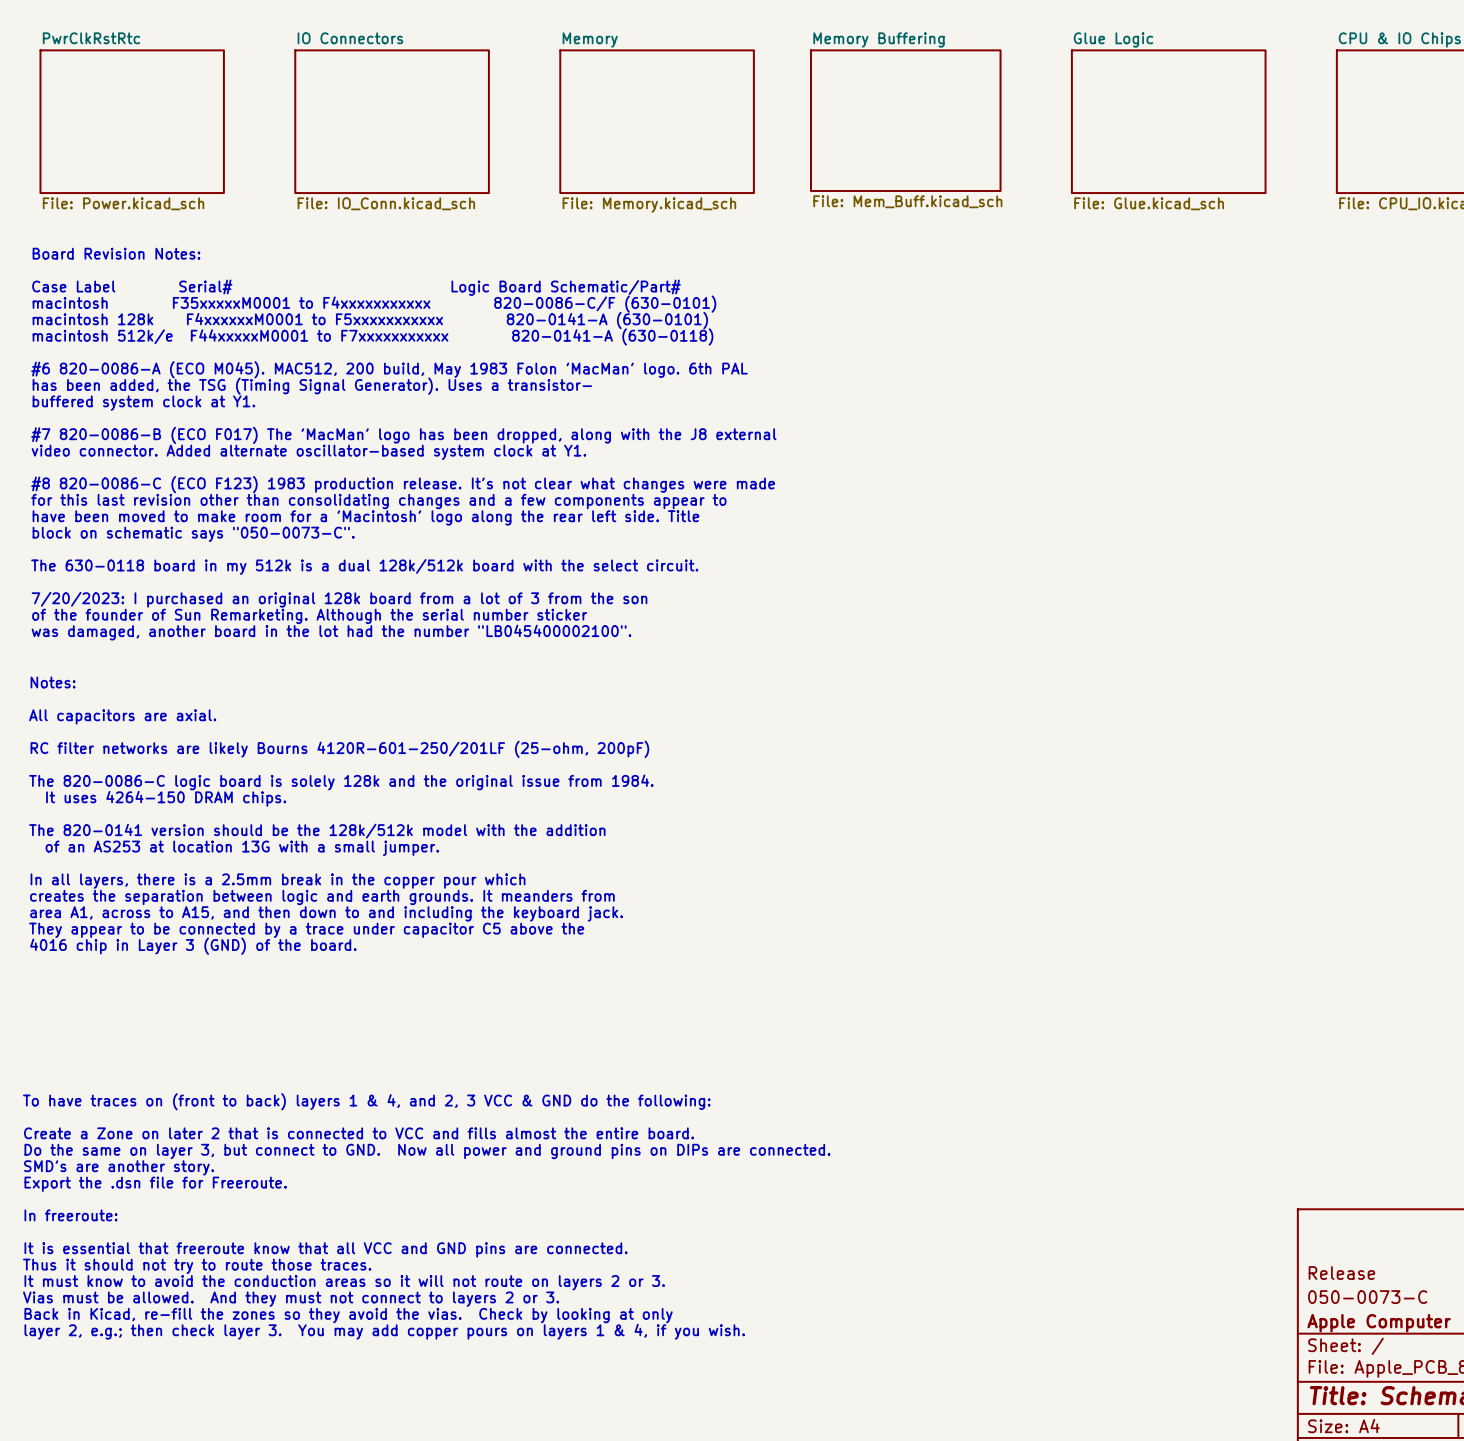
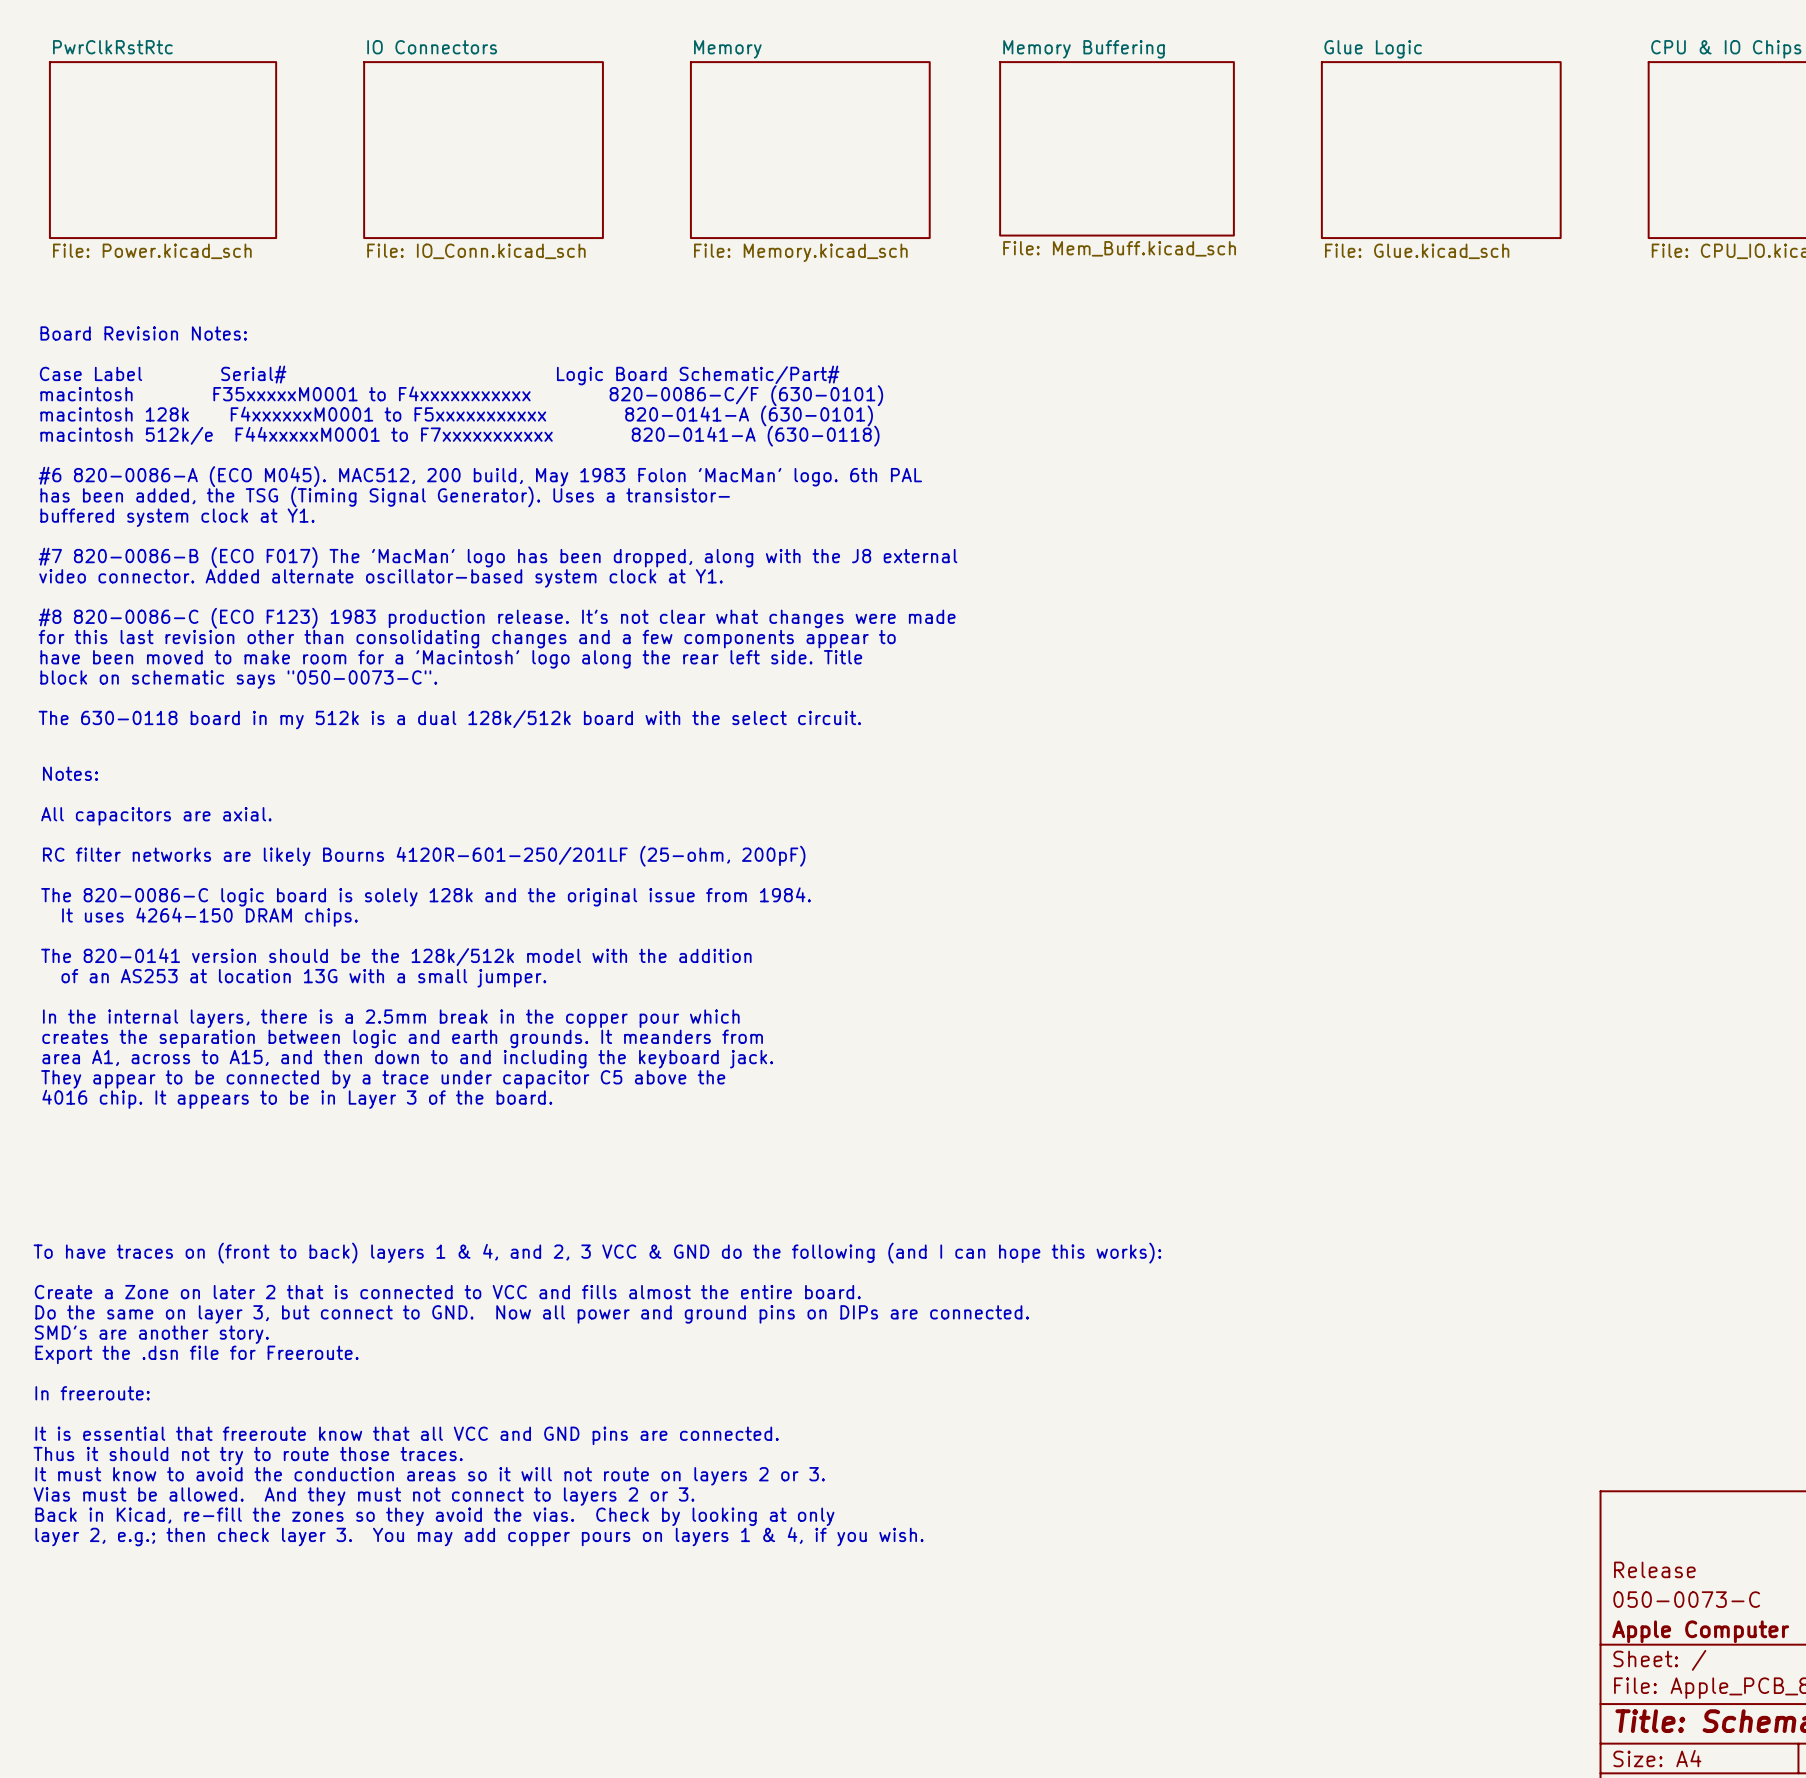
text position: Board Revision Notes: (116, 253) -> Board Revision Notes: (143, 333)
text: Case Label Serial# Logic Board Schematic/Part# (356, 287) -> none
text: macintosh F35xxxxxM0001 to F4xxxxxxxxxxx 820-0086-C/F (630-0101) (374, 304) -> Case Label Serial# Logic Board Schematic/Part# (439, 375)
text: macintosh 128k F4xxxxxxM0001 to F5xxxxxxxxxxx 820-0141-A (630-0101) (370, 320) -> macintosh F35xxxxxM0001 to F4xxxxxxxxxxx 820-0086-C/F (630-0101) (461, 395)
text: macintosh 512k/e F44xxxxxM0001 to F7xxxxxxxxxxx 820-0141-A (630-0118) (373, 336) -> macintosh 128k F4xxxxxxM0001 to F5xxxxxxxxxxx 820-0141-A (630-0101) (456, 415)
text: none -> macintosh 512k/e F44xxxxxM0001 to F7xxxxxxxxxxx 820-0141-A (630-0118) (459, 436)
text: #6 820-0086-A (ECO M045). MAC512, 200 build, May 1983 Folon 'MacMan' logo. 6th PAL (389, 369) -> none
text: has been added, the TSG (Timing Signal Generator). Uses a transistor- (312, 386) -> #6 820-0086-A (ECO M045). MAC512, 200 build, May 1983 Folon 'MacMan' logo. 6th PAL (480, 476)
text: buffered system clock at Y1. (143, 403) -> has been added, the TSG (Timing Signal Generator). Uses a transistor- (385, 496)
text: none -> buffered system clock at Y1. (177, 517)
text: #7 820-0086-B (ECO F017) The 'MacMan' logo has been dropped, along with the J8 external (403, 435) -> none
text: video connector. Added alternate oscillator-based system clock at Y1. (308, 452) -> #7 820-0086-B (ECO F017) The 'MacMan' logo has been dropped, along with the J8 external (497, 557)
text: none -> video connector. Added alternate oscillator-based system clock at Y1. (380, 578)
text: #8 820-0086-C (ECO F123) 1983 production release. It's not clear what changes were made (403, 484) -> none
text: for this last revision other than consolidating changes and a few components appear to (378, 501) -> #8 820-0086-C (ECO F123) 1983 production release. It's not clear what changes were made (497, 618)
text: have been moved to make room for a 'Macintosh' logo along the rear left side. Title (365, 517) -> for this last revision other than consolidating changes and a few components appear to (467, 639)
text: block on schematic says "050-0073-C". (193, 534) -> have been moved to make room for a 'Macintosh' logo along the rear left side. Title (451, 659)
text: none -> block on schematic says "050-0073-C". (238, 679)
text position: The 630-0118 board in my 512k is a dual 128k/512k board with the select circuit. (364, 566) -> The 630-0118 board in my 512k is a dual 128k/512k board with the select circuit. (449, 719)
text: 7/20/2023: I purchased an original 128k board from a lot of 3 from the son (339, 599) -> none
text: of the founder of Sun Remarketing. Although the serial number sticker (309, 616) -> none
text: was damaged, another board in the lot had the number "LB045400002100". (331, 632) -> none
text position: Notes: (53, 682) -> Notes: (70, 773)
text position: All capacitors are axial. (122, 716) -> All capacitors are axial. (156, 816)
text position: RC filter networks are likely Bourns 4120R-601-250/201LF (25-ohm, 200pF) (339, 749) -> RC filter networks are likely Bourns 4120R-601-250/201LF (25-ohm, 200pF) (424, 856)
text position: The 820-0086-C logic board is solely 128k and the original issue from 1984. (341, 782) -> The 820-0086-C logic board is solely 128k and the original issue from 1984. (425, 896)
text position: It uses 4264-150 DRAM chips. (166, 798) -> It uses 4264-150 DRAM chips. (209, 917)
text: none -> In the internal layers, there is a 2.5mm break in the copper pour which (391, 1018)
text position: The 820-0141 version should be the 128k/512k model with the addition (317, 831) -> The 820-0141 version should be the 128k/512k model with the addition (396, 957)
text position: of an AS253 at location 13G with a small jumper. (242, 848) -> of an AS253 at location 13G with a small jumper. (303, 978)
text: In all layers, there is a 2.5mm break in the copper pour which (278, 881) -> none
text: none -> 4016 chip. It appears to be in Layer 3 of the board. (297, 1099)
text position: creates the separation between logic and earth grounds. It meanders from (322, 897) -> creates the separation between logic and earth grounds. It meanders from (402, 1038)
text position: area A1, across to A15, and then down to and including the keyboard jack. (326, 913) -> area A1, across to A15, and then down to and including the keyboard jack. (407, 1059)
text position: They appear to be connected by a trace under capacitor C5 above the (306, 930) -> They appear to be connected by a trace under capacitor C5 above the (383, 1079)
text: 4016 chip in Layer 3 (GND) of the board. (193, 946) -> none
text: none -> To have traces on (front to back) layers 1 & 4, and 2, 3 VCC & GND do the following (and I can hope this works): (597, 1253)
text: To have traces on (front to back) layers 1 & 4, and 2, 3 VCC & GND do the following: (366, 1101) -> none
text position: Create a Zone on later 2 that is connected to VCC and fills almost the entire board. (359, 1133) -> Create a Zone on later 2 that is connected to VCC and fills almost the entire board. (447, 1292)
text position: Do the same on layer 3, but connect to GND. Now all power and ground pins on DIPs are connected. (427, 1151) -> Do the same on layer 3, but connect to GND. Now all power and ground pins on DIPs are connected. (532, 1314)
text position: SMD's are another story. (119, 1167) -> SMD's are another story. (151, 1334)
text position: Export the .dsn file for Freeroute. (155, 1184) -> Export the .dsn file for Freeroute. (197, 1354)
text position: In freeroute: (70, 1215) -> In freeroute: (92, 1393)
text position: It is essential that freeroute know that all VCC and GND pins are connected. (326, 1249) -> It is essential that freeroute know that all VCC and GND pins are connected. (407, 1435)
text position: Thus it should not try to route those traces. (197, 1266) -> Thus it should not try to route those traces. (248, 1456)
text position: It must know to avoid the conduction areas so it will not route on layers 2 or 3. (344, 1282) -> It must know to avoid the conduction areas so it will not route on layers 2 or 3. (430, 1476)
text position: Vias must be allowed. And they must not connect to layers 2 or 3. (291, 1299) -> Vias must be allowed. And they must not connect to layers 2 or 3. (363, 1496)
text position: Back in Kicad, re-fill the zones so they avoid the vias. Check by looking at only (348, 1315) -> Back in Kicad, re-fill the zones so they avoid the vias. Check by looking at only (434, 1516)
text position: layer 2, e.g.; then check layer 3. You may add copper pours on layers 1 & 4, if you wish. (384, 1331) -> layer 2, e.g.; then check layer 3. You may add copper pours on layers 1 & 4, if you wish. (479, 1536)

